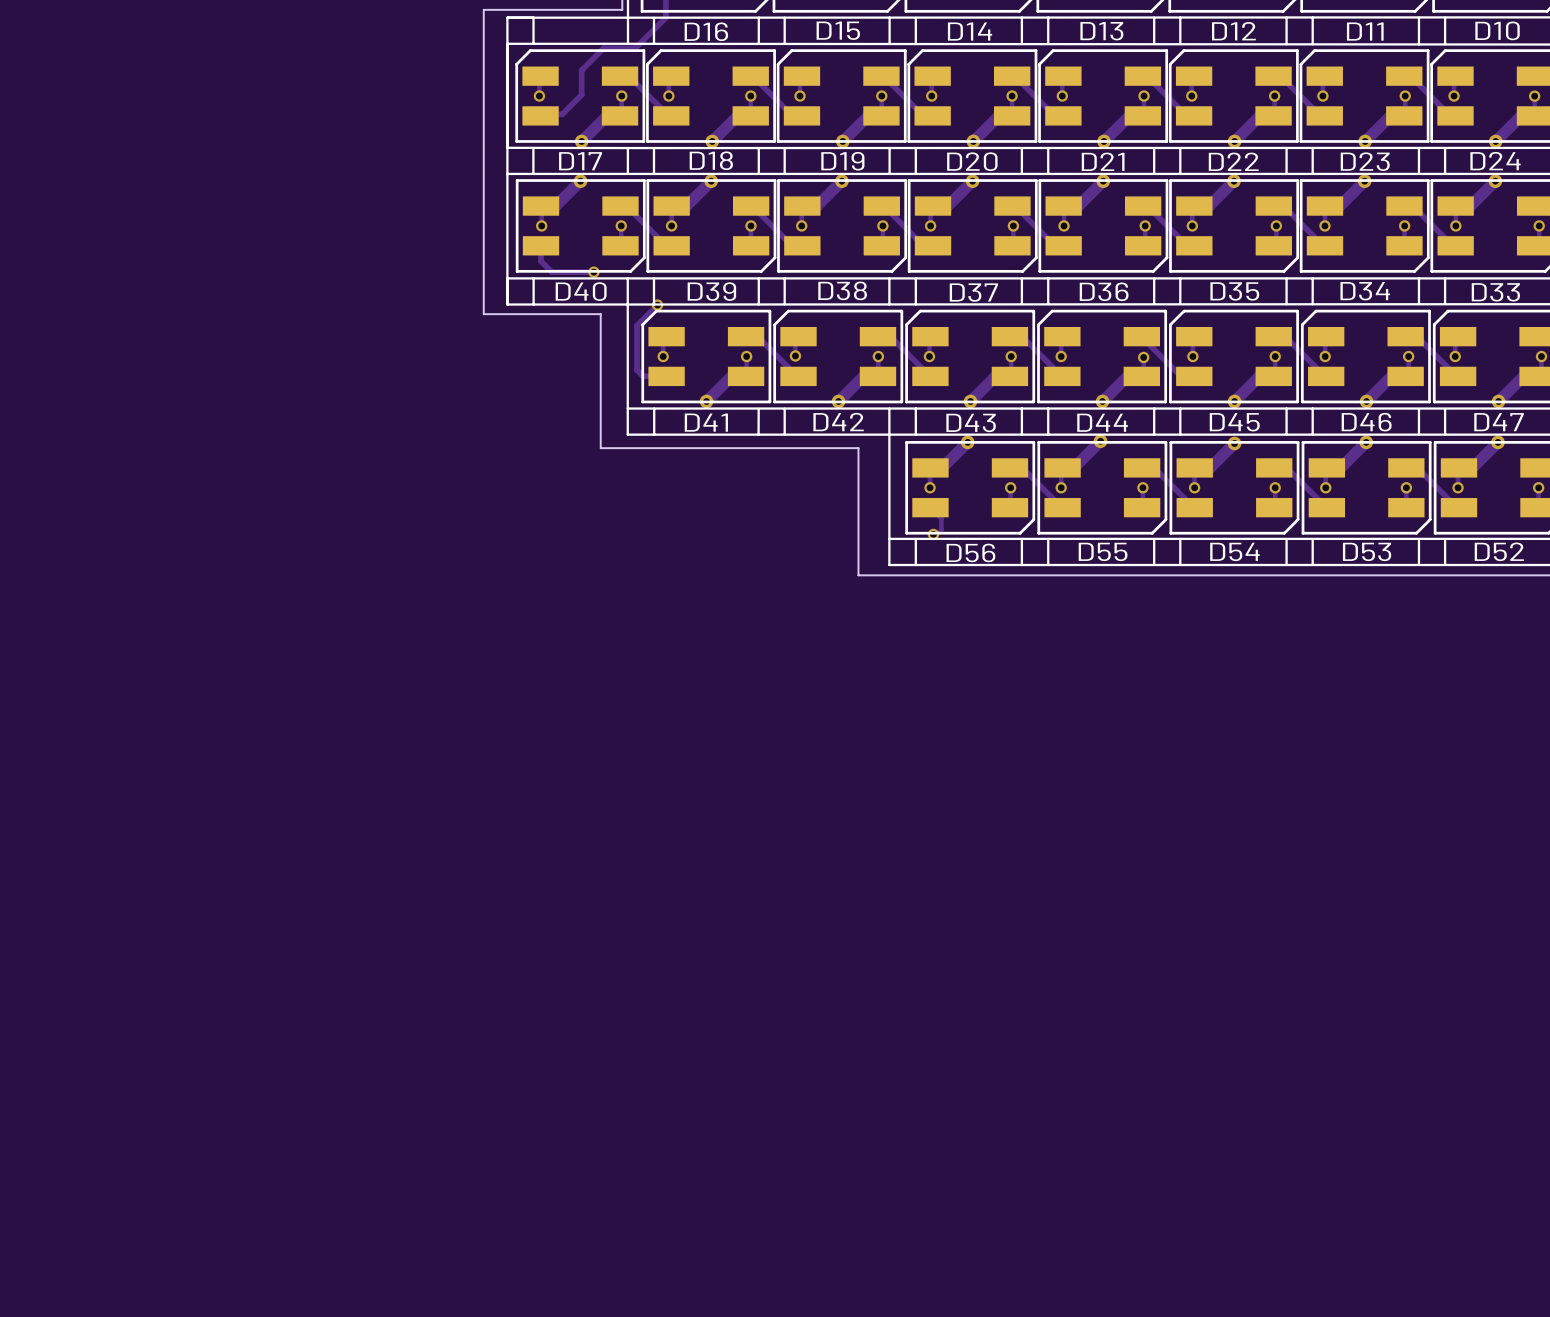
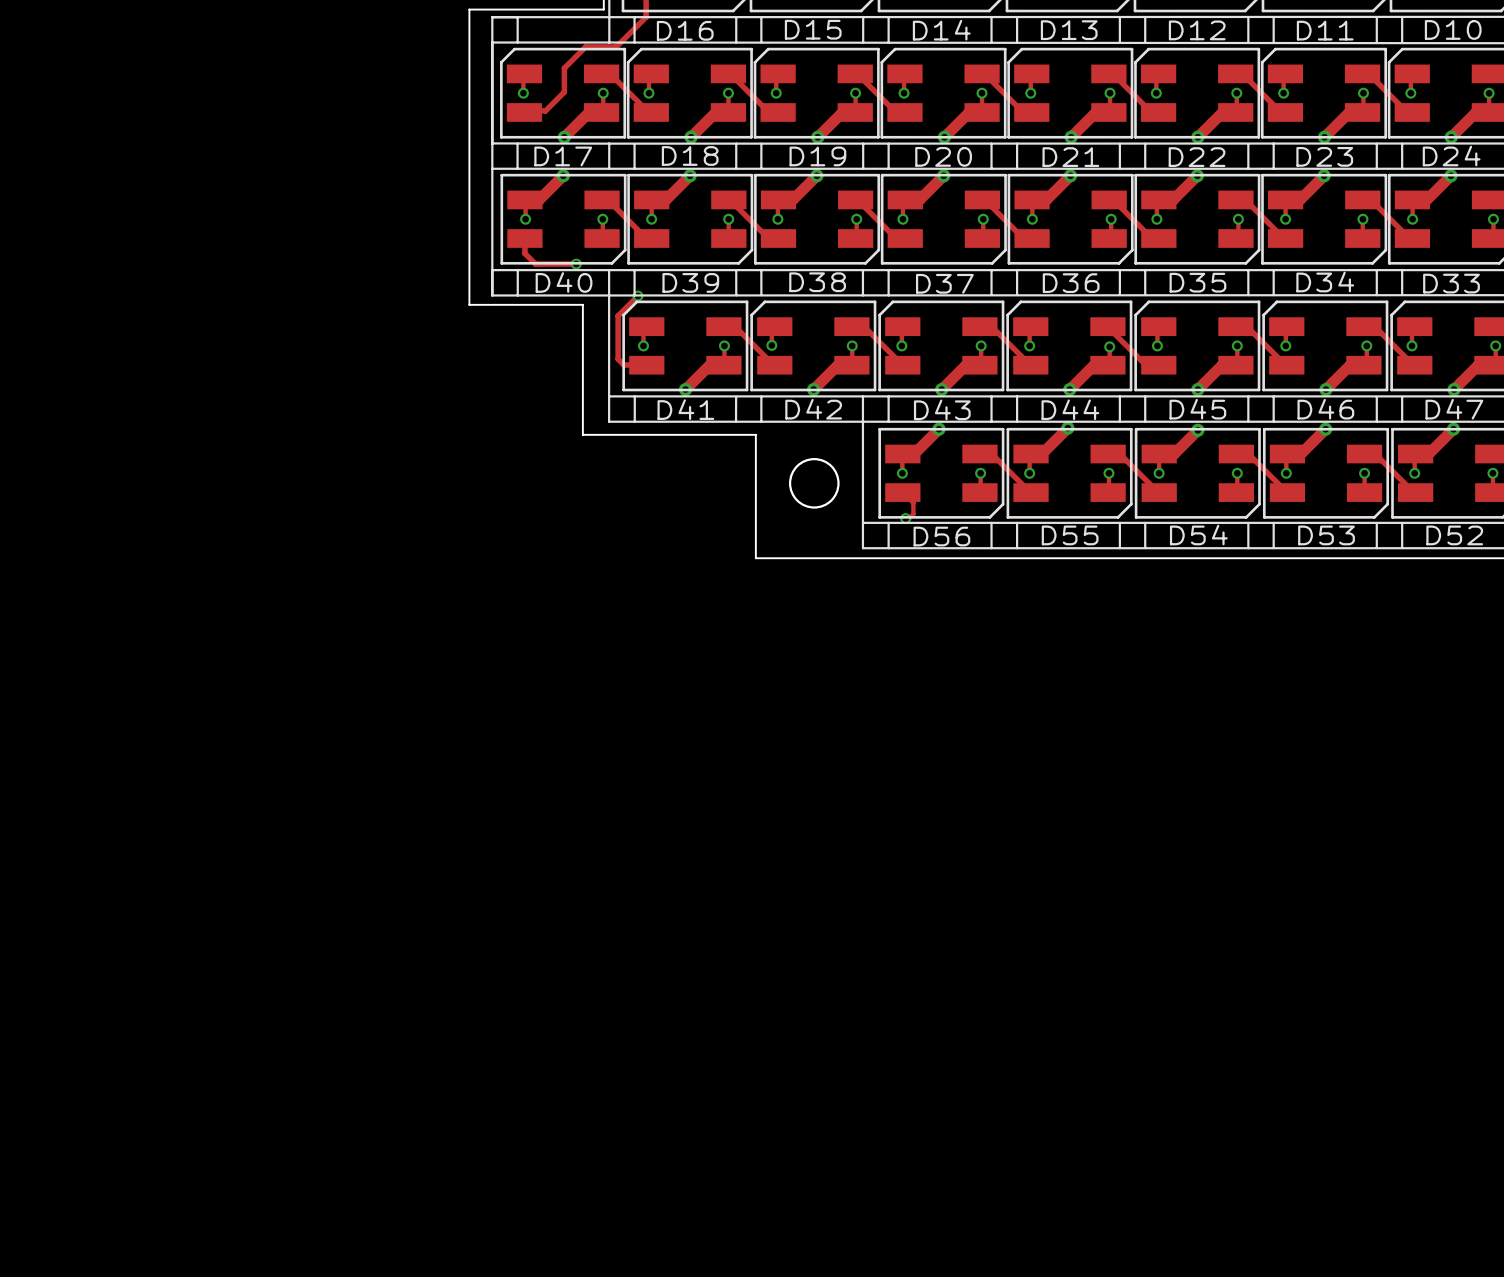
board edge: (779, 448) (858, 448) (858, 575) -> (755, 434) (755, 558) (832, 558)
round board edge: none -> [788, 458, 840, 509]

